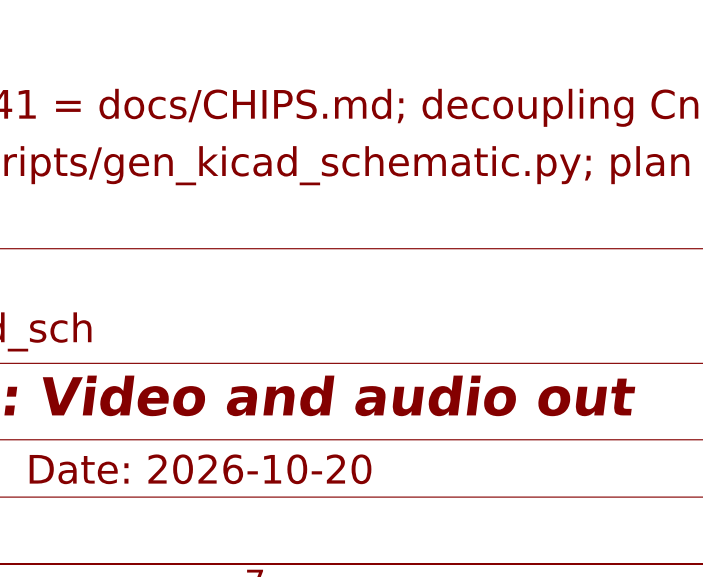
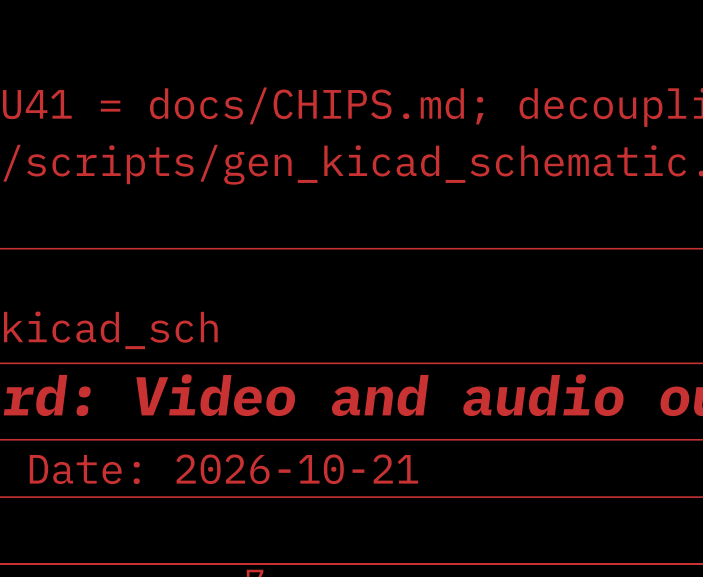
title block: Date: 2026-10-20 (200, 469) -> Date: 2026-10-21 (223, 469)

